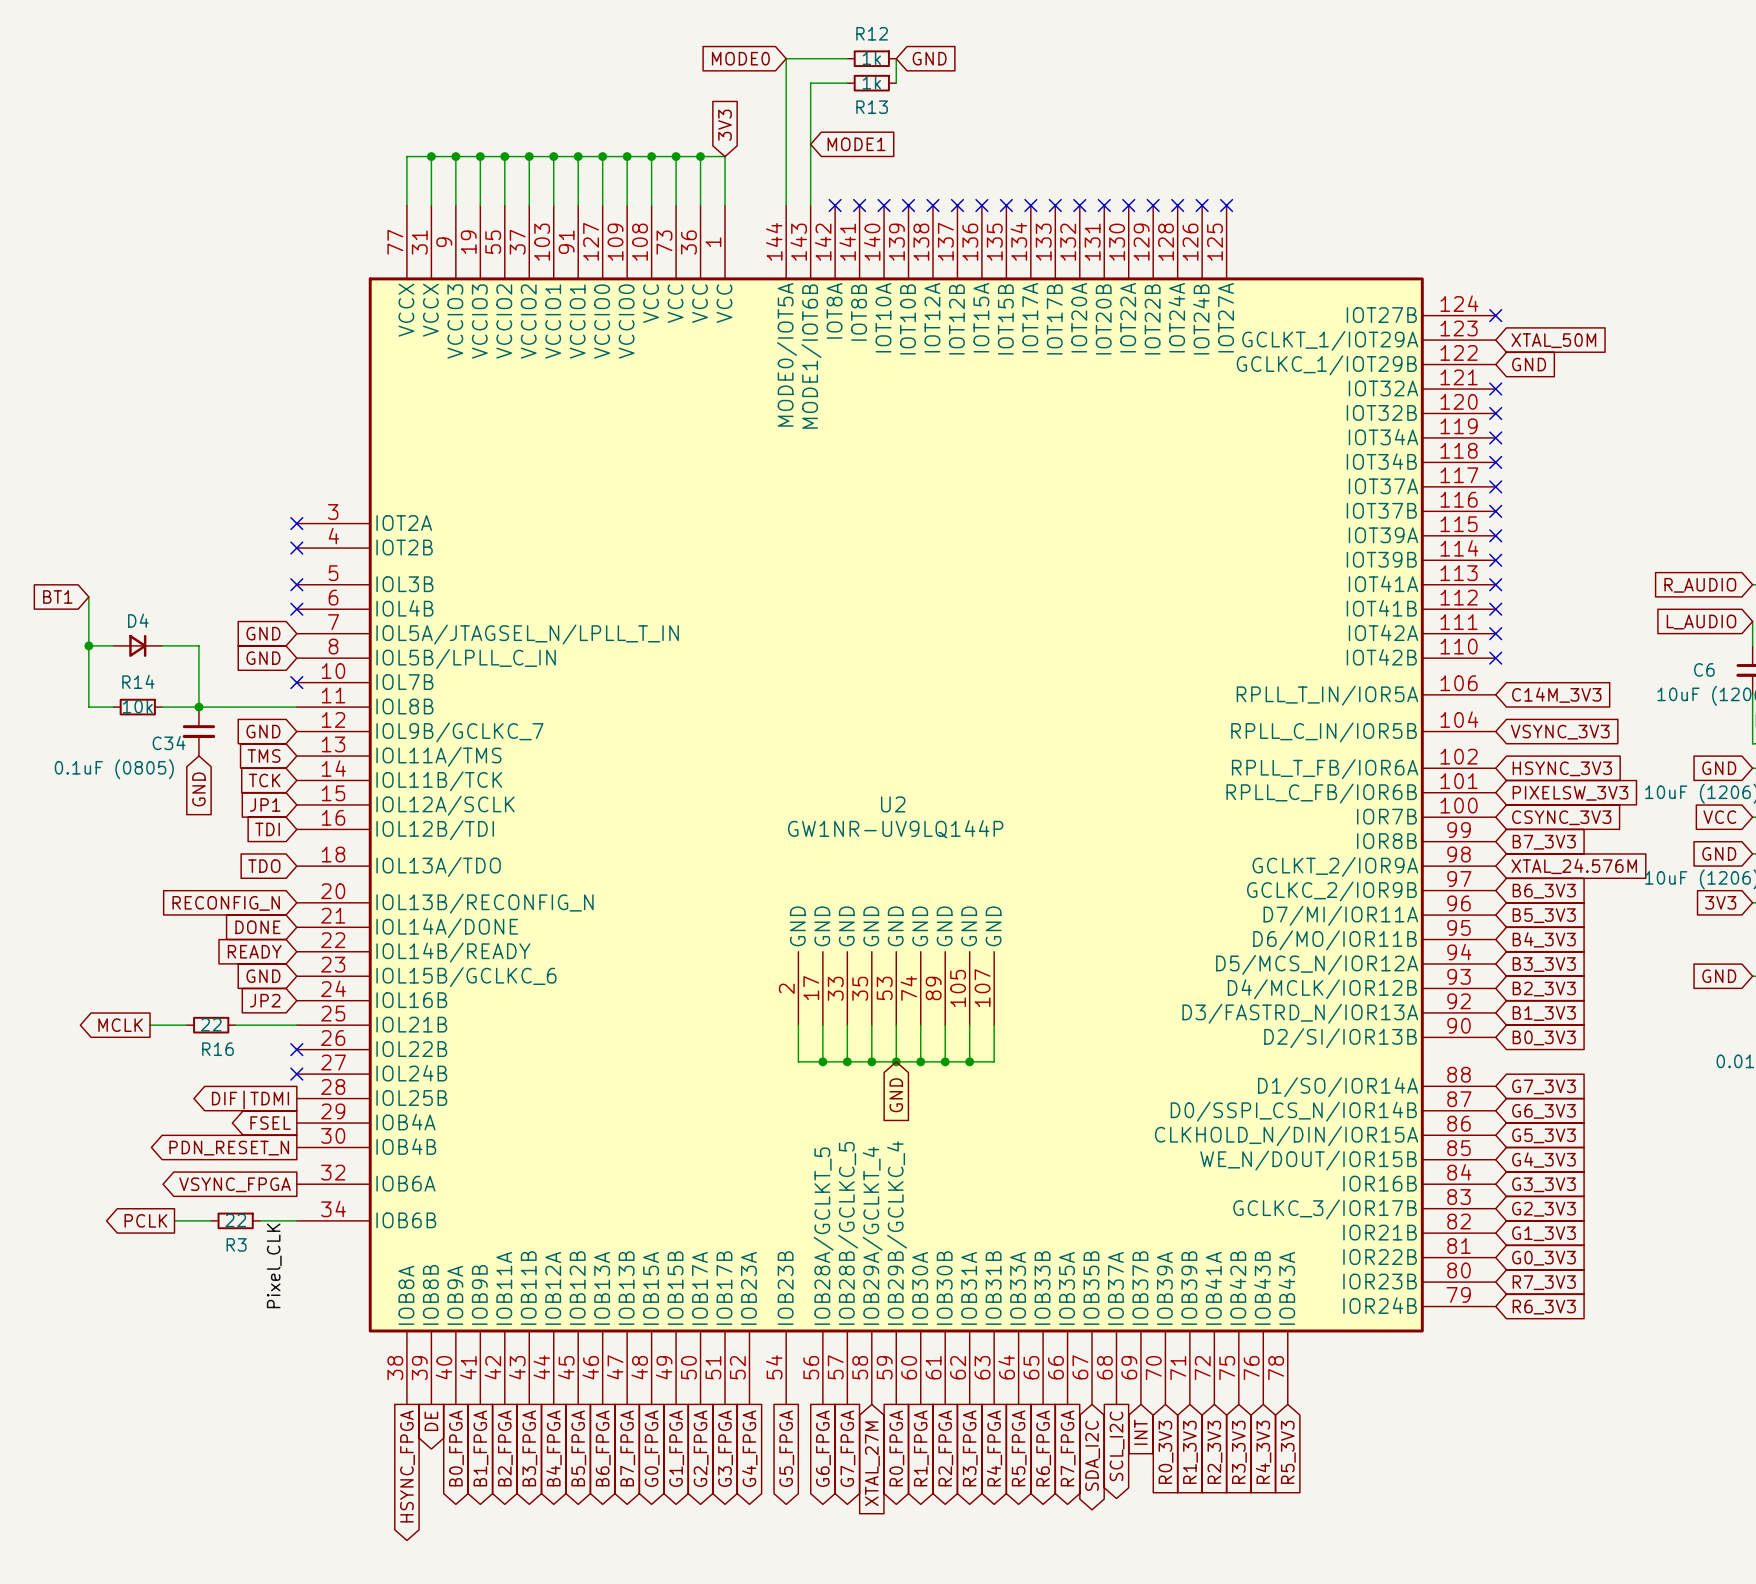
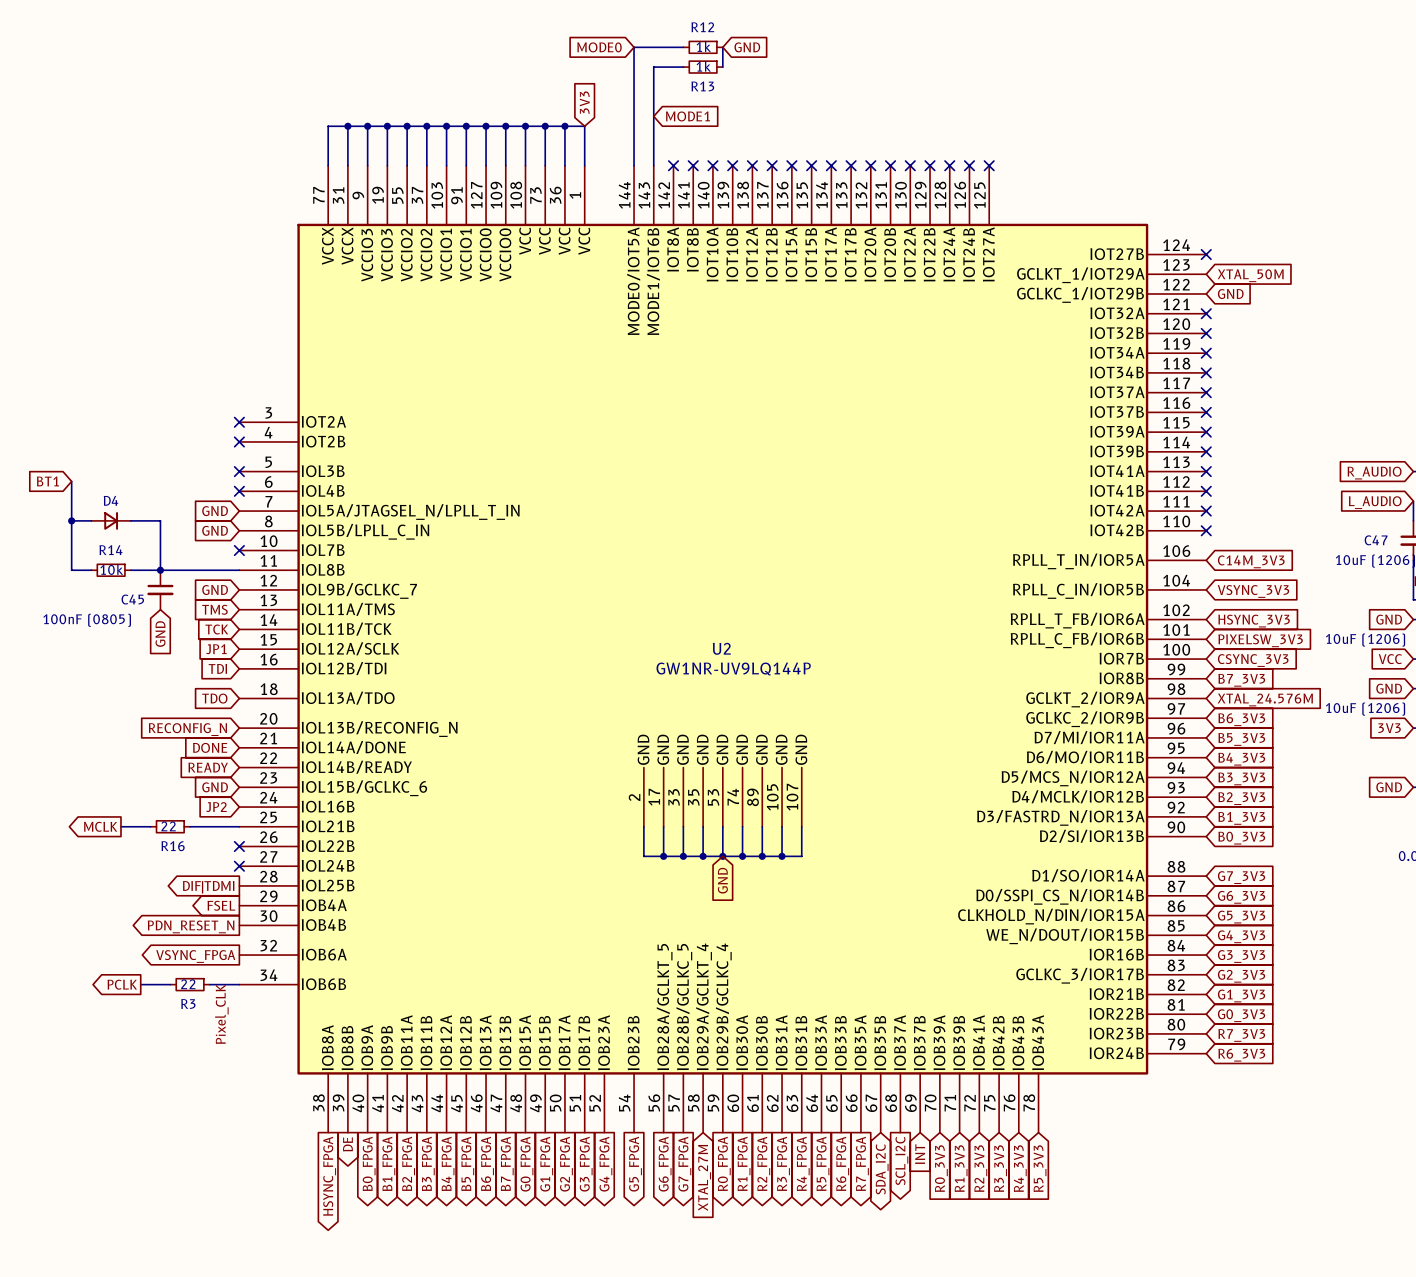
C6 name: C6 (1704, 669) -> C47 (1376, 540)
C34 name: C34 (169, 743) -> C45 (132, 599)
C34 value: 0.1uF (0805) (114, 769) -> 100nF (0805) (87, 620)

